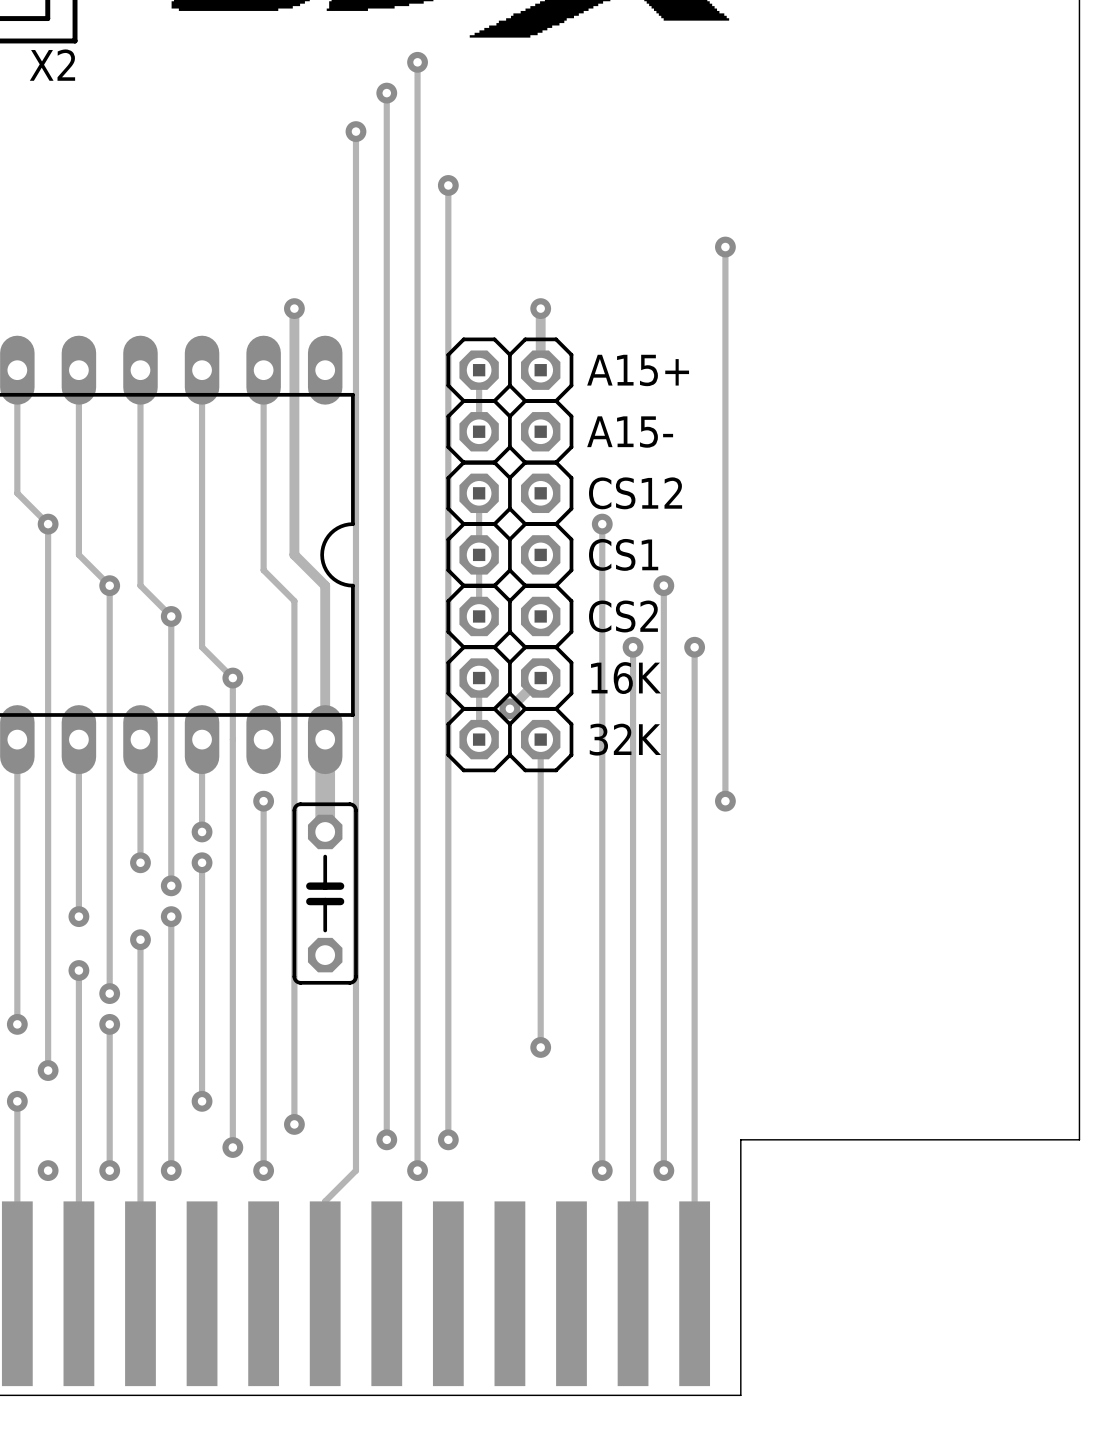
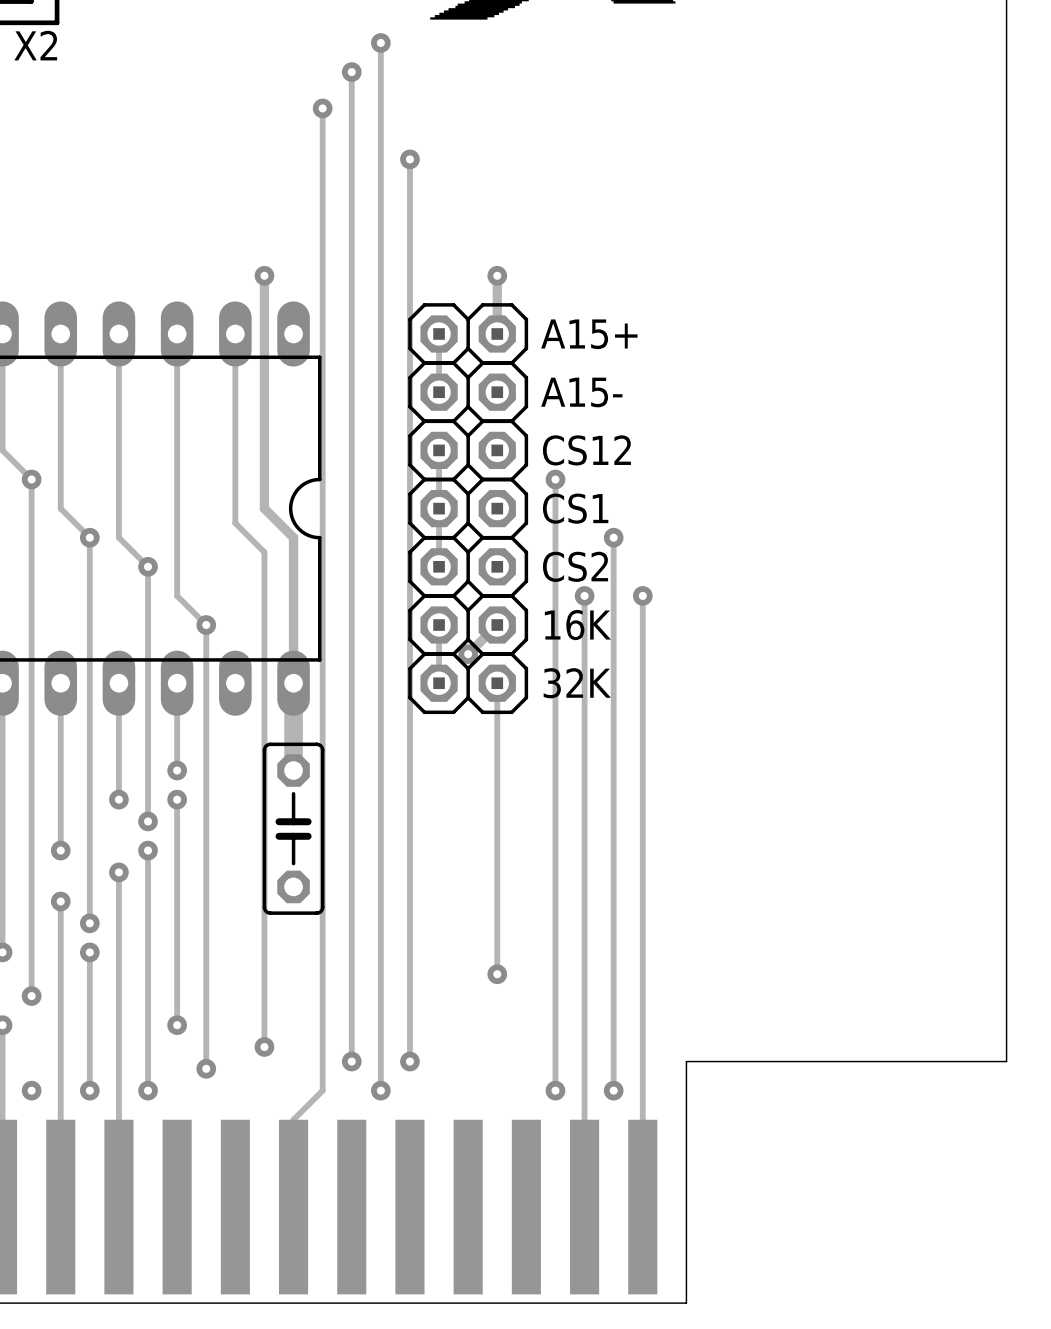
track: (725, 247) (725, 801) -> none
via: (725, 247) -> none
track: (263, 801) (263, 1170) -> none
via: (263, 801) -> none
via: (725, 801) -> none
via: (263, 1170) -> none

